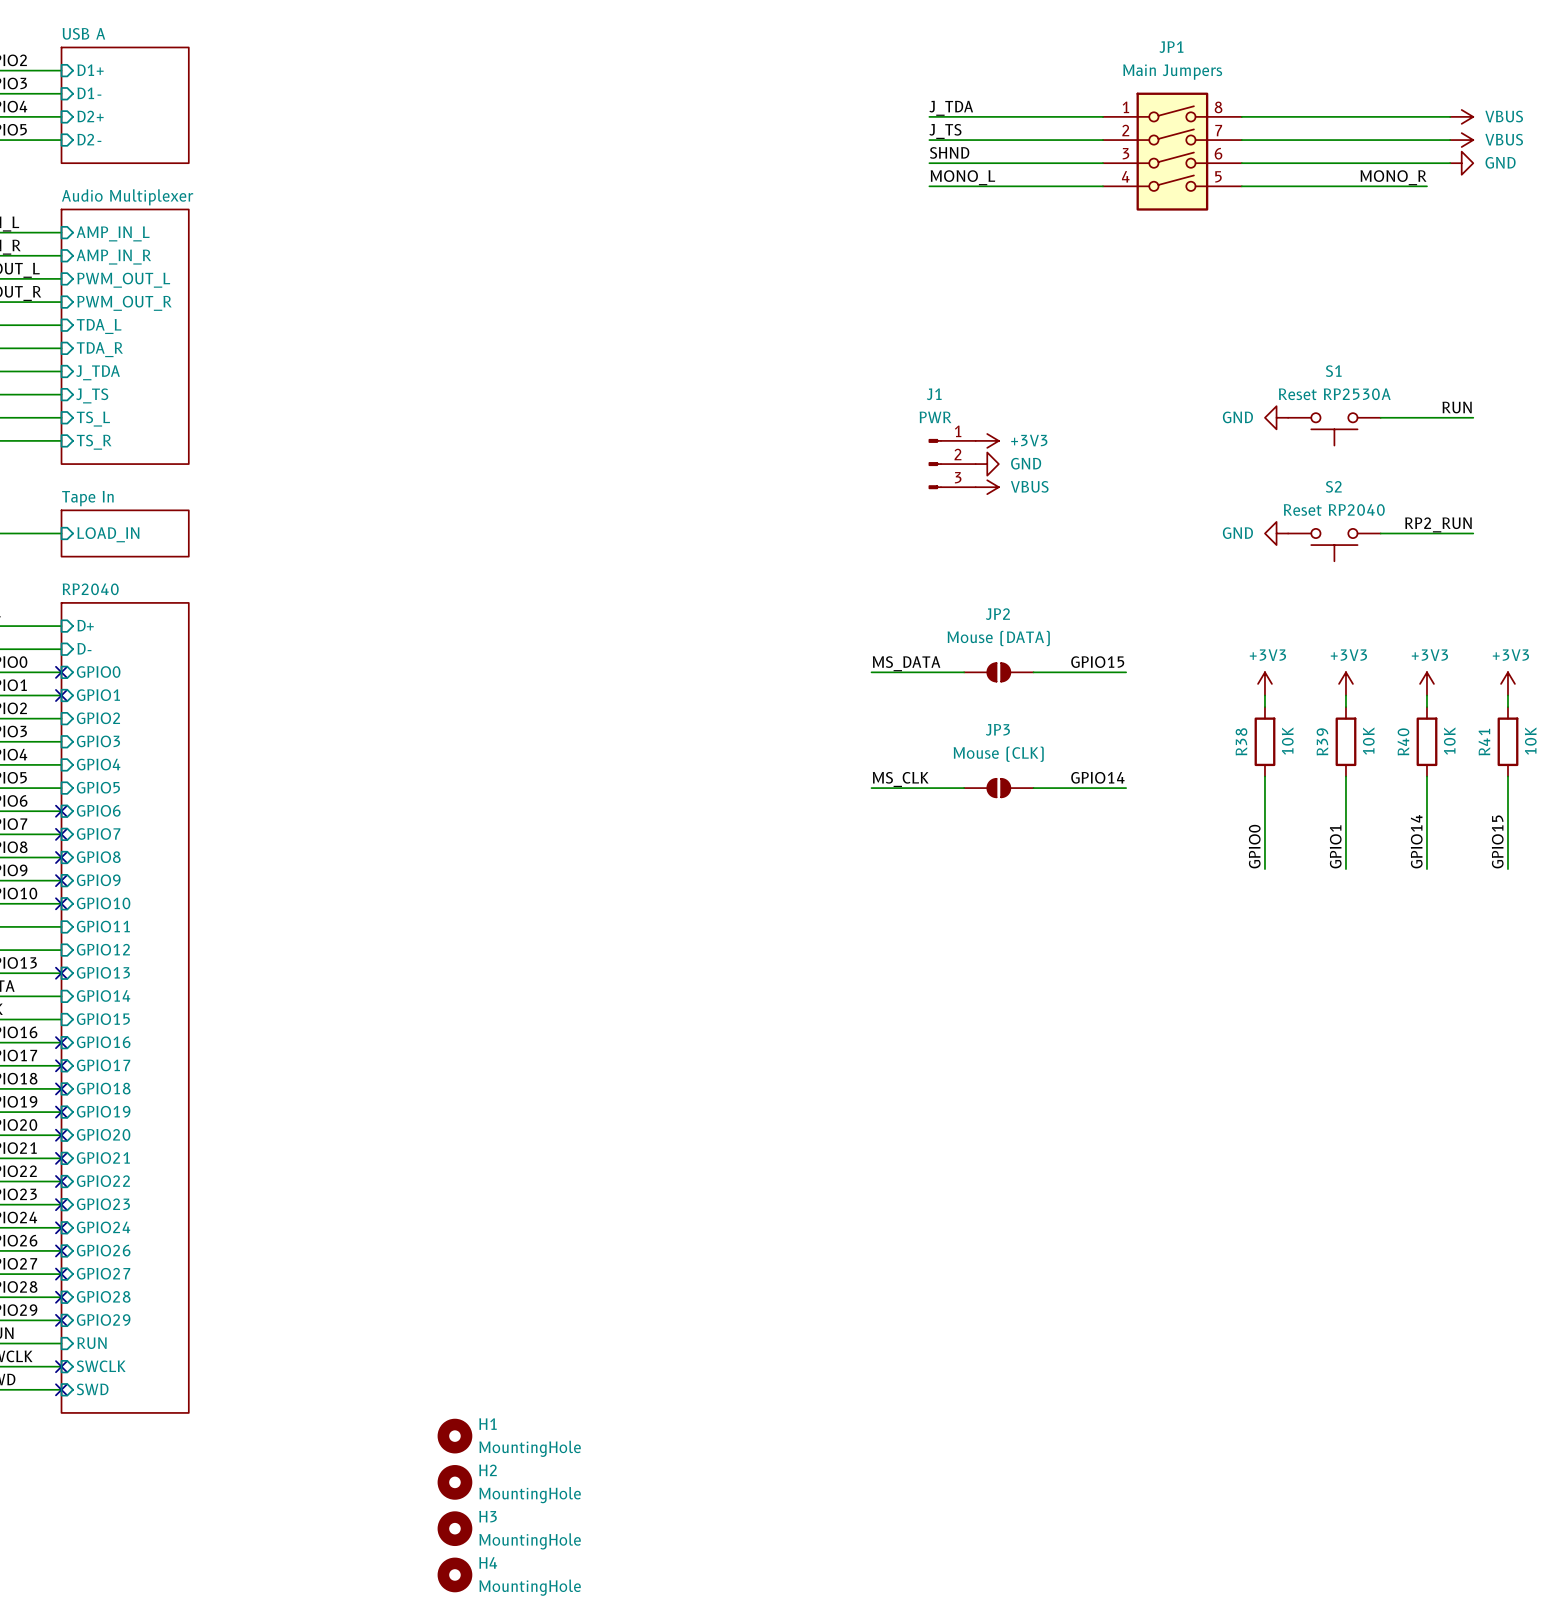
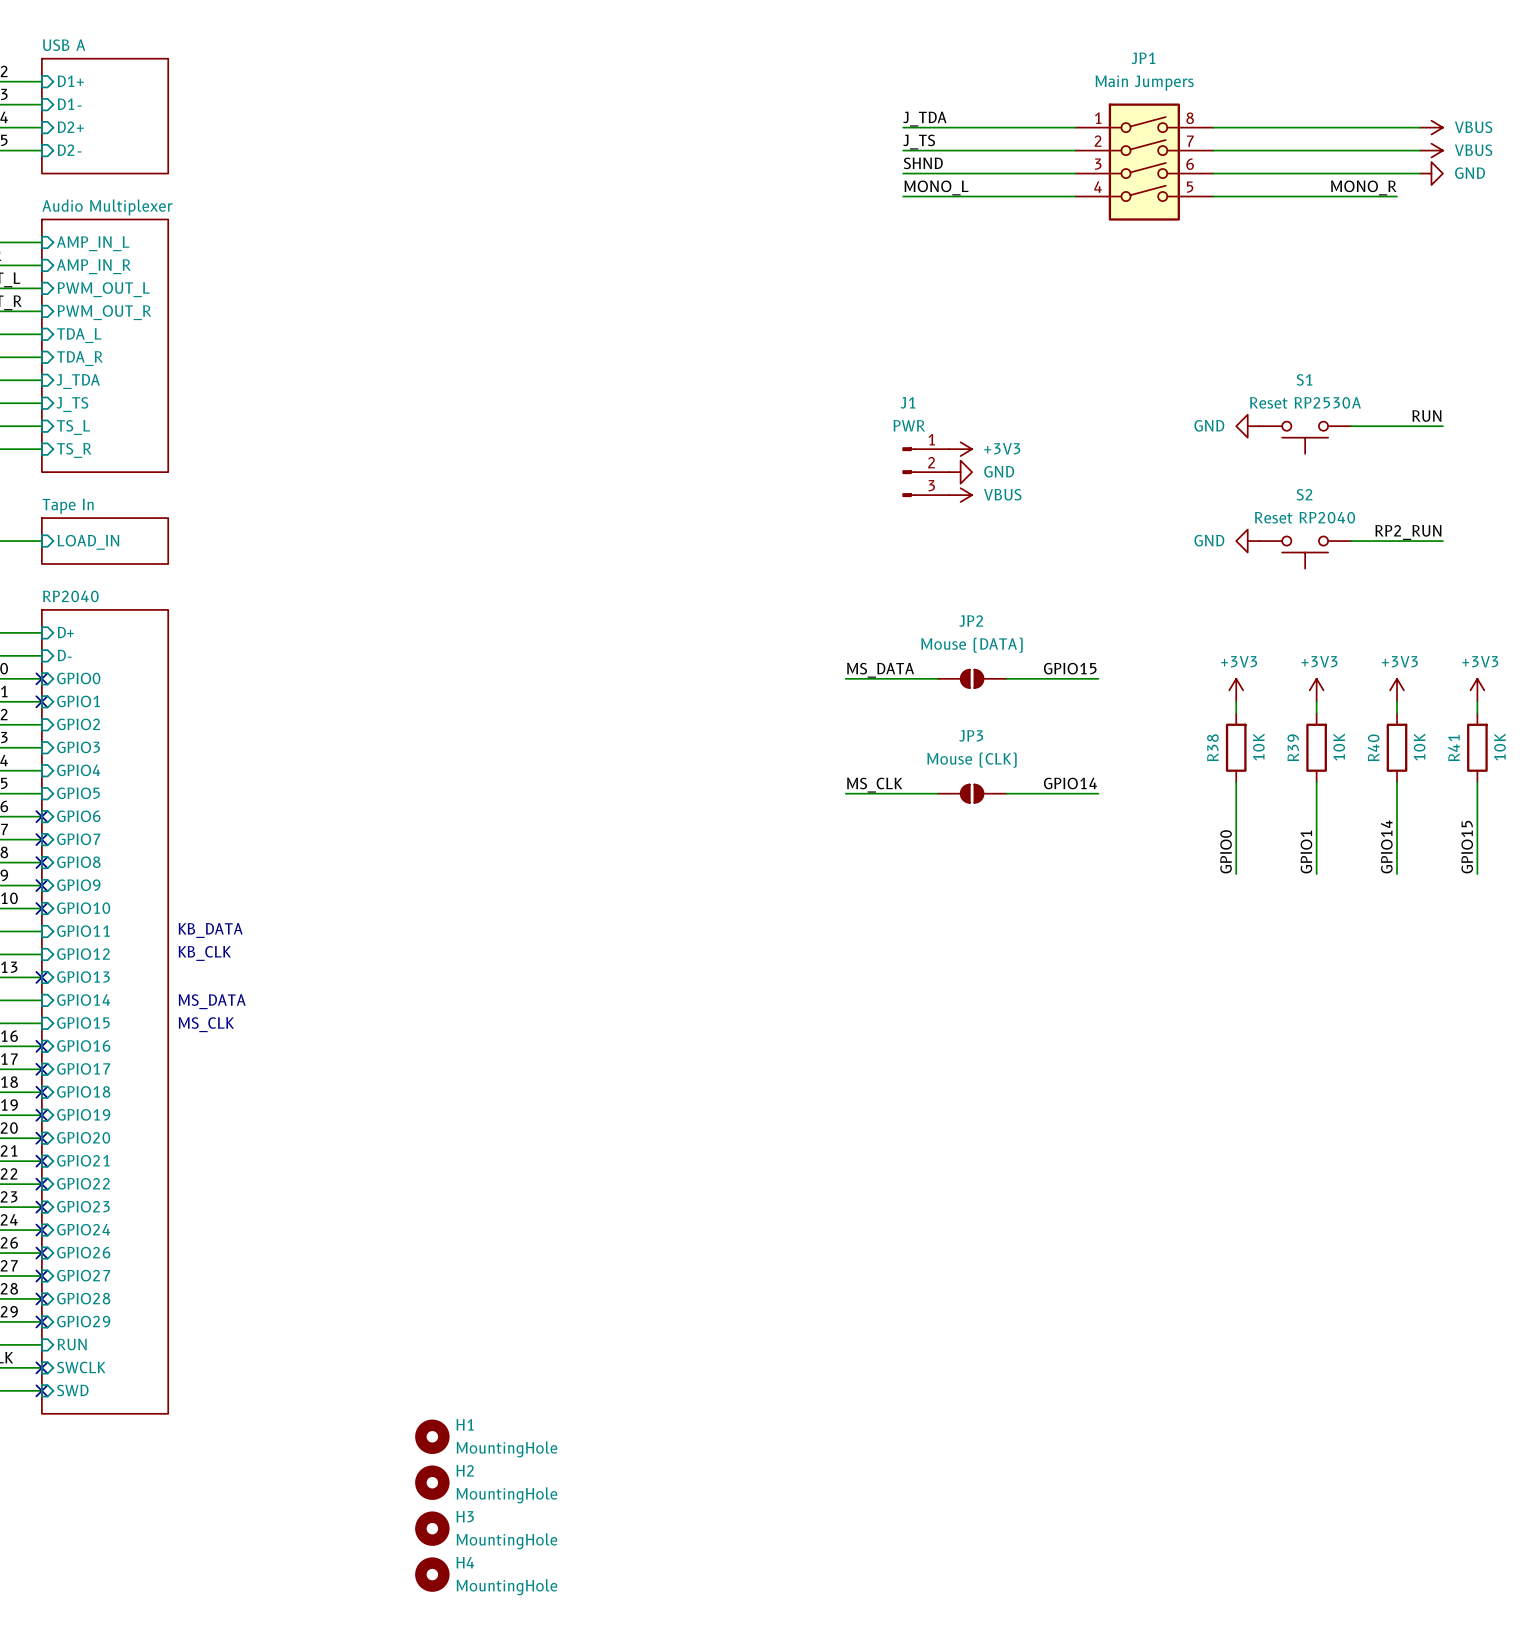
text: none -> KB_DATA (210, 930)
text: none -> KB_CLK (204, 953)
text: none -> MS_DATA (212, 1001)
text: none -> MS_CLK (206, 1024)

